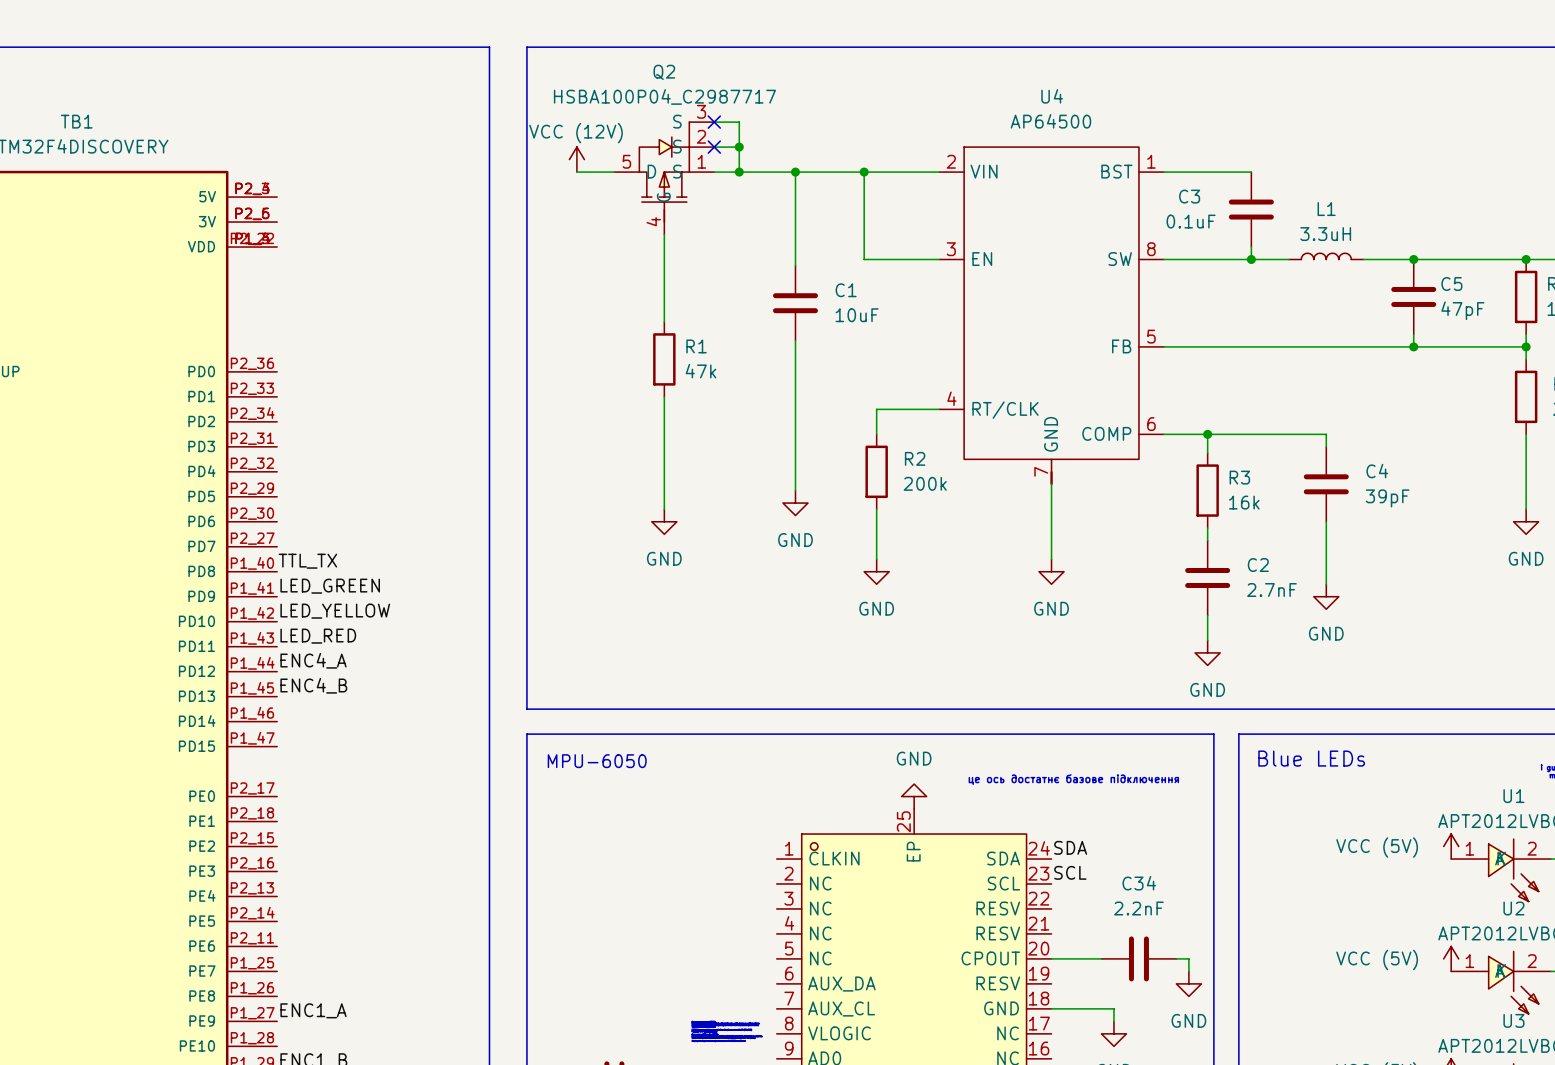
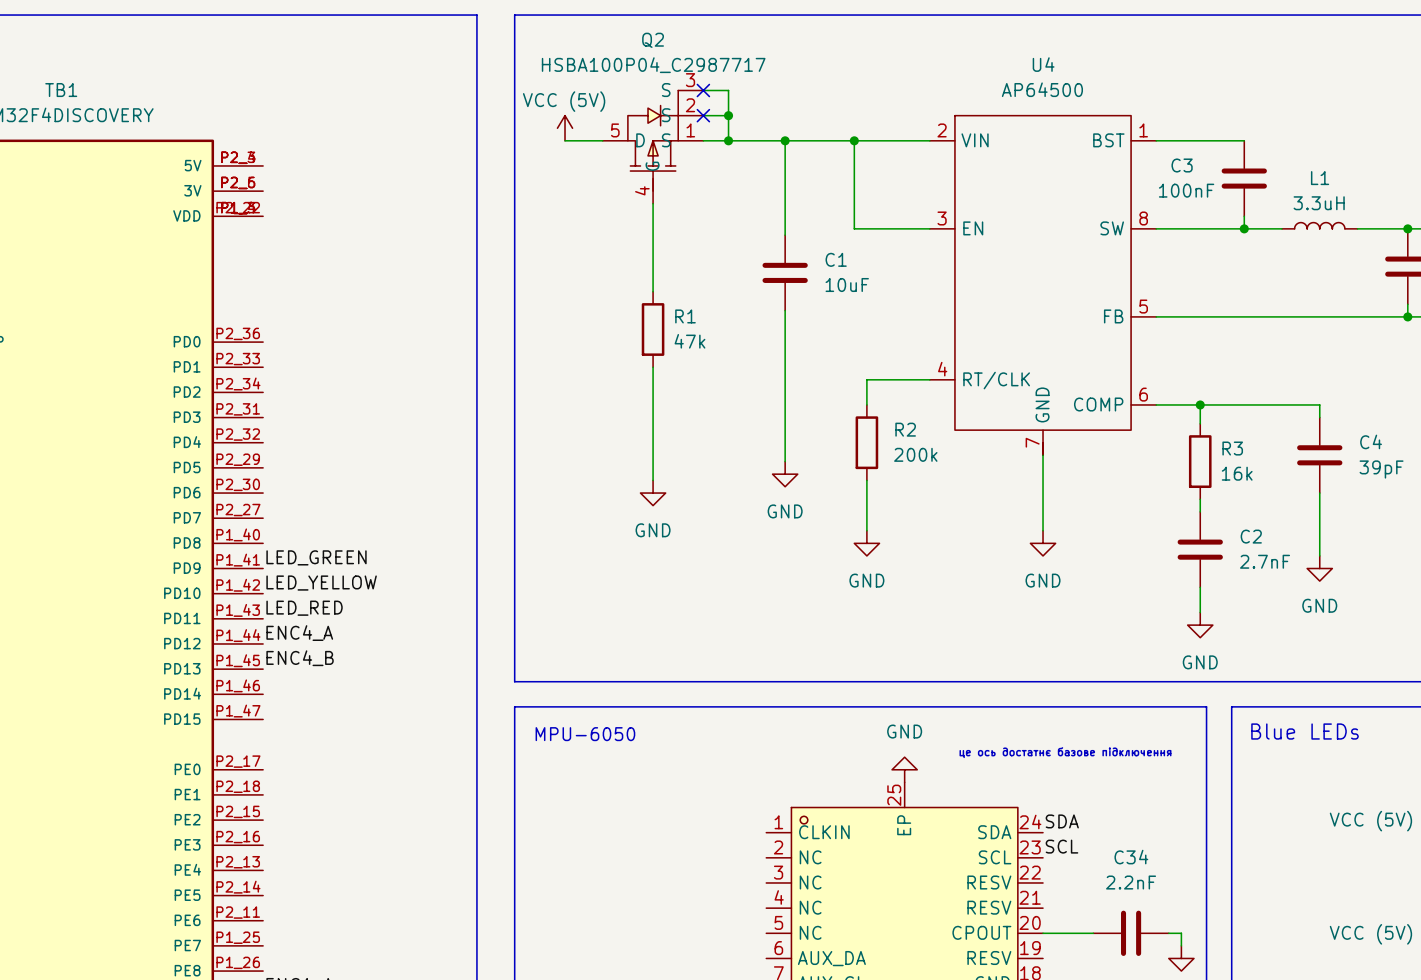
power symbol: VCC (12V) (576, 159) -> VCC (5V) (565, 128)
C3 value: 0.1uF (1191, 221) -> 100nF (1186, 190)
label: TTL_TX (307, 561) -> none

